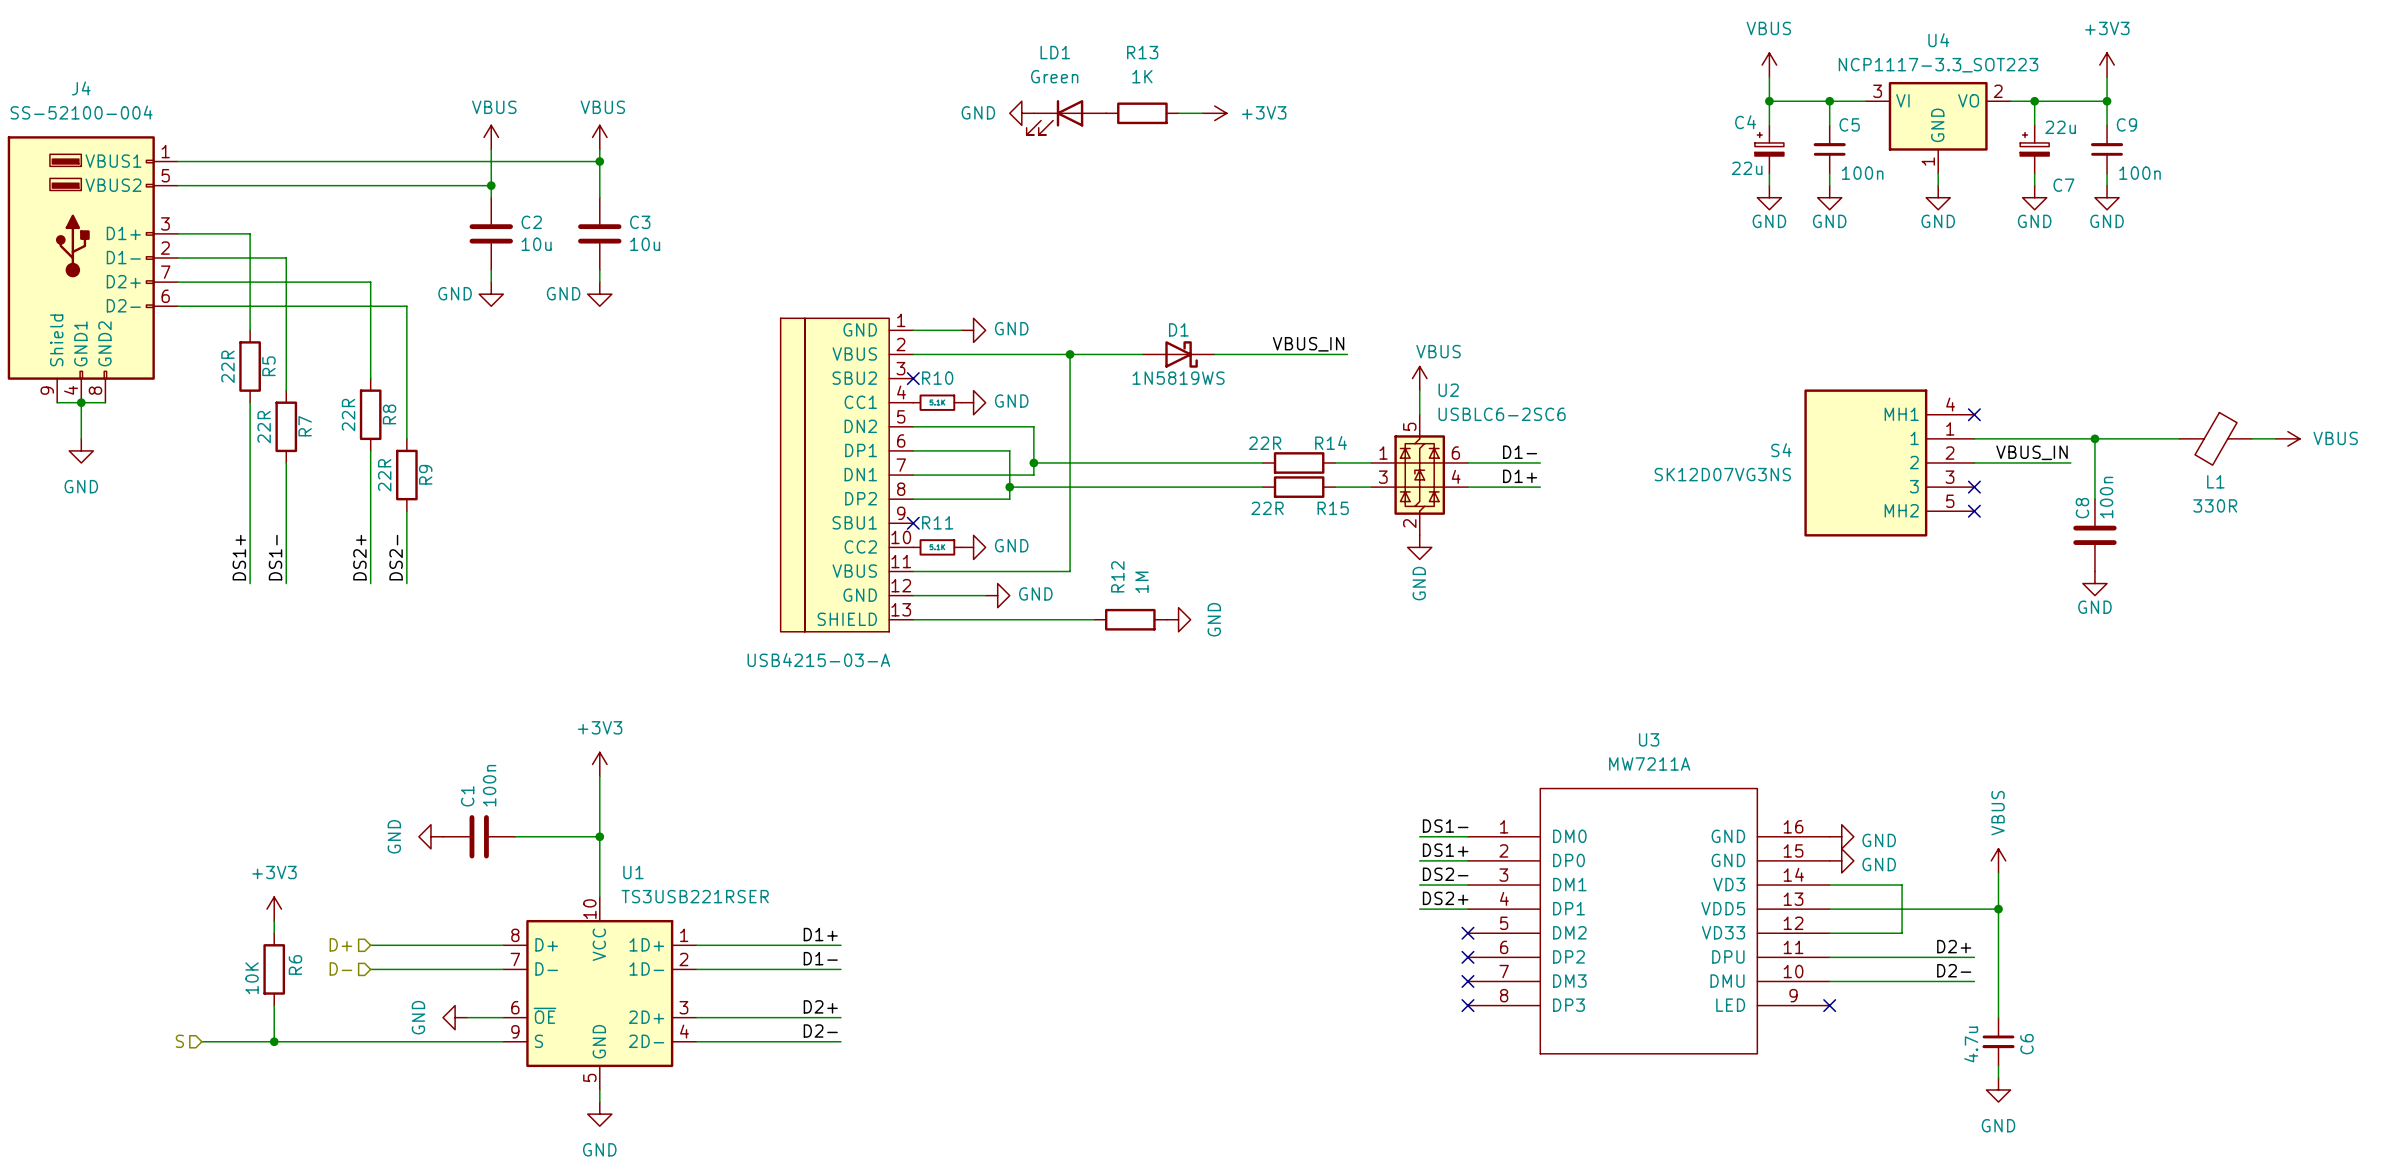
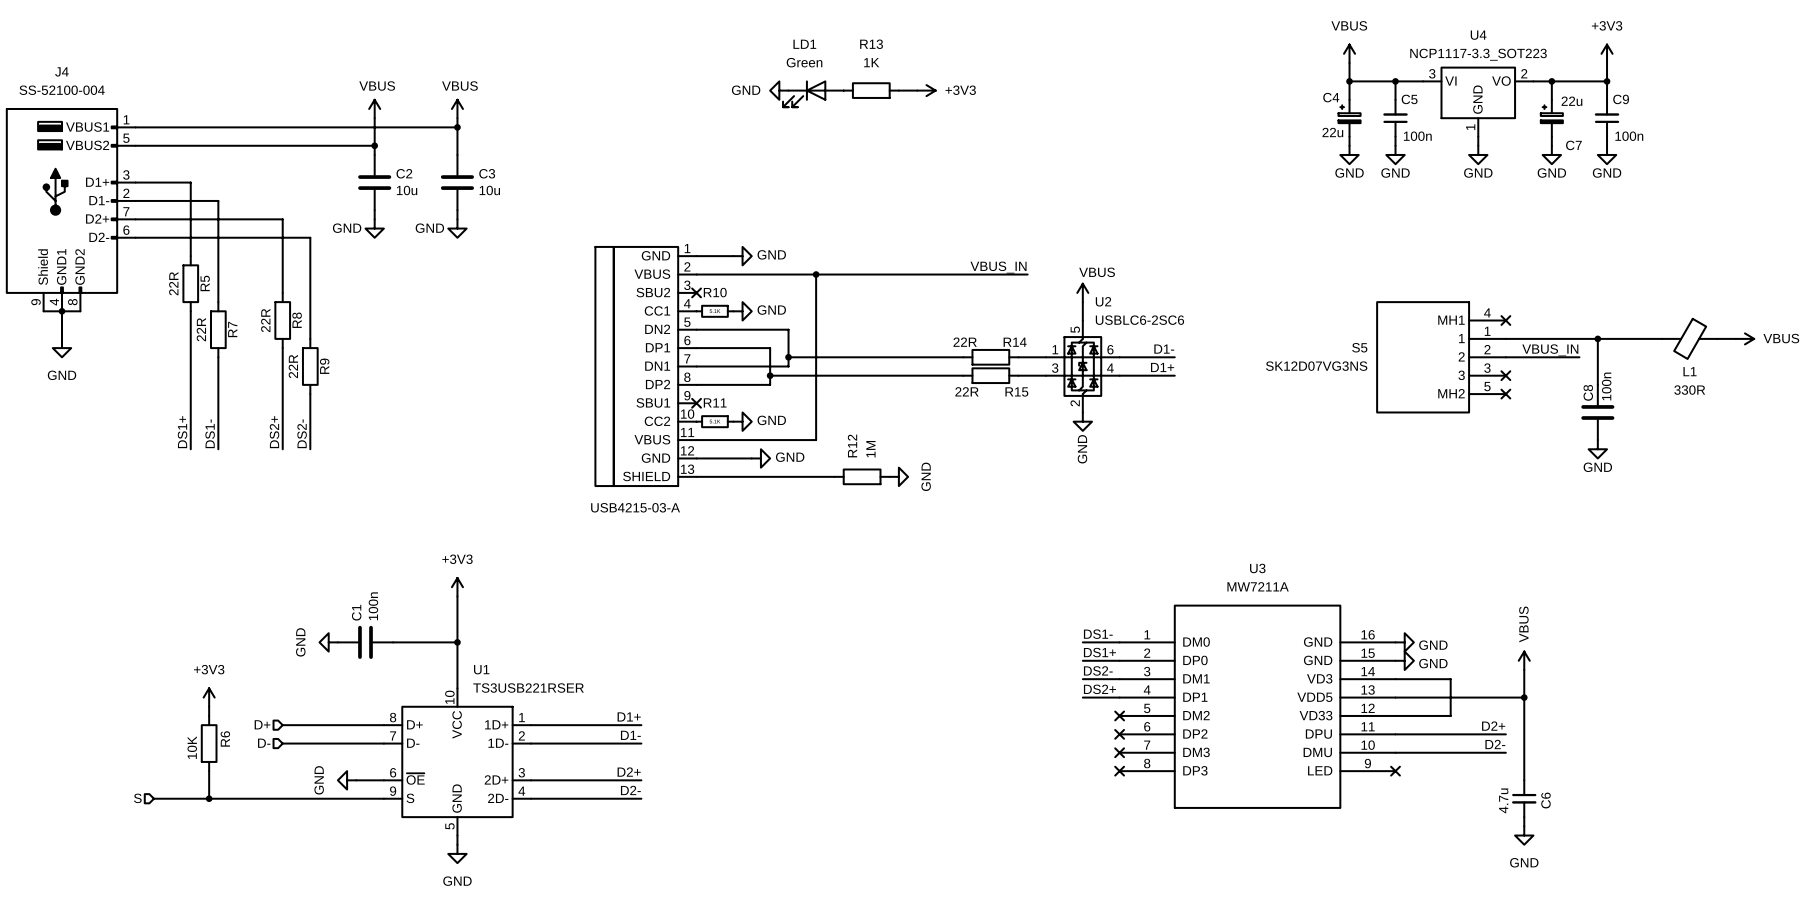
D1: 1N5819WS (1178, 354) -> none
S4 name: S4 (1781, 450) -> S5 (1359, 347)

